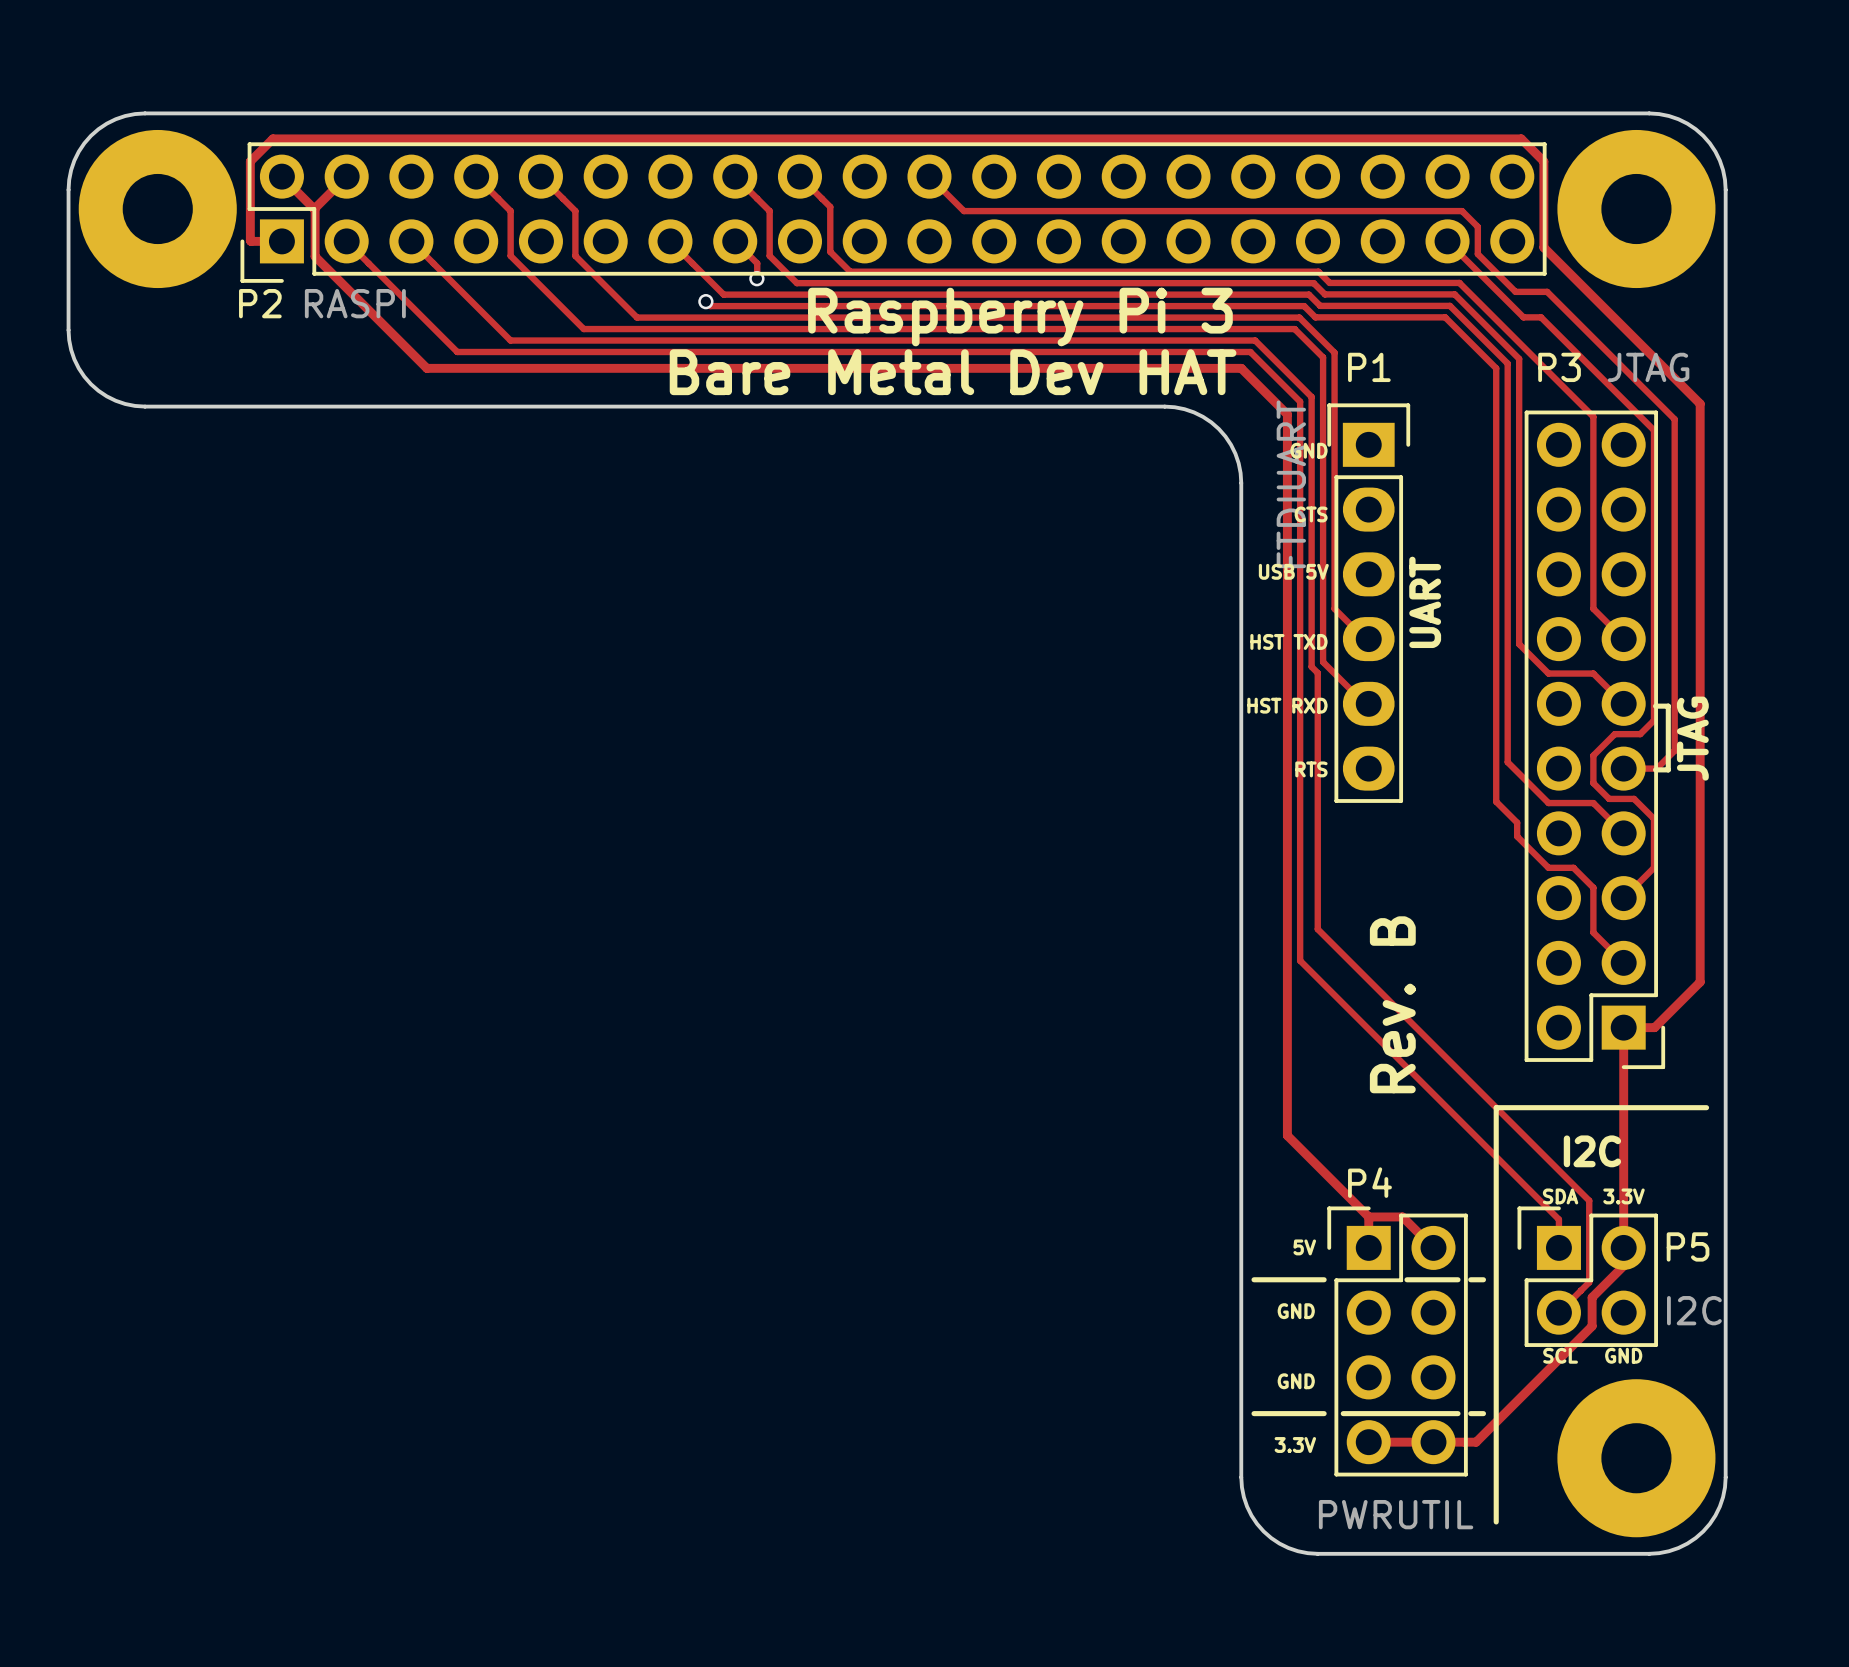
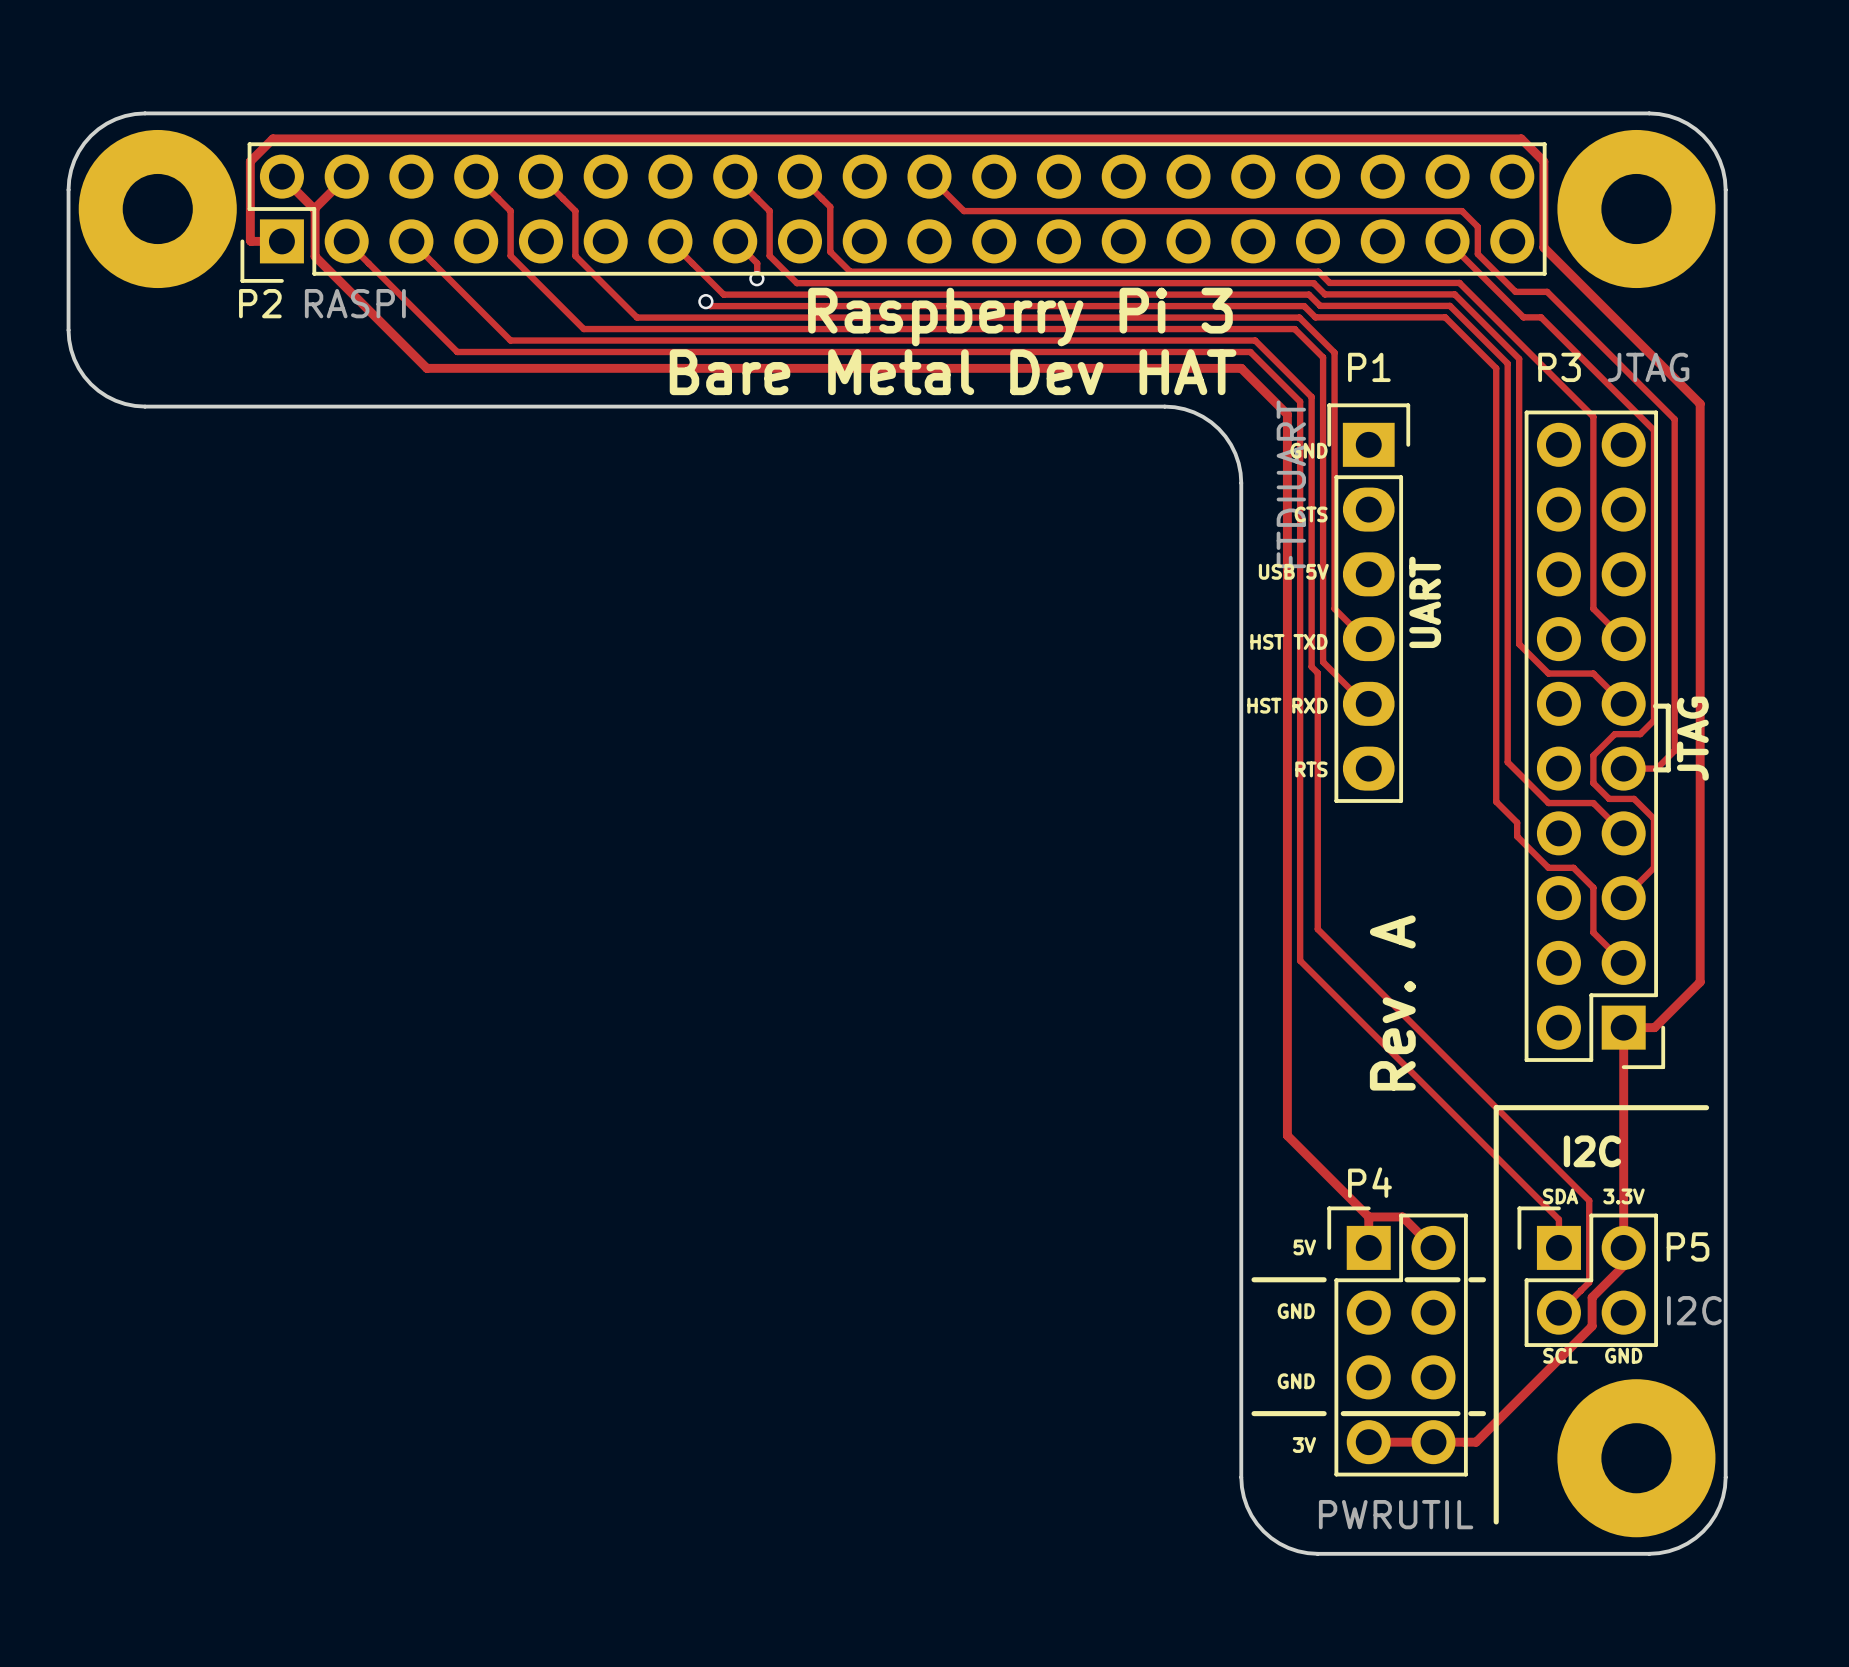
text: Rev. B (1392, 1004) -> Rev. A (1392, 1002)
text: 3.3V (1295, 1445) -> 3V (1304, 1445)

